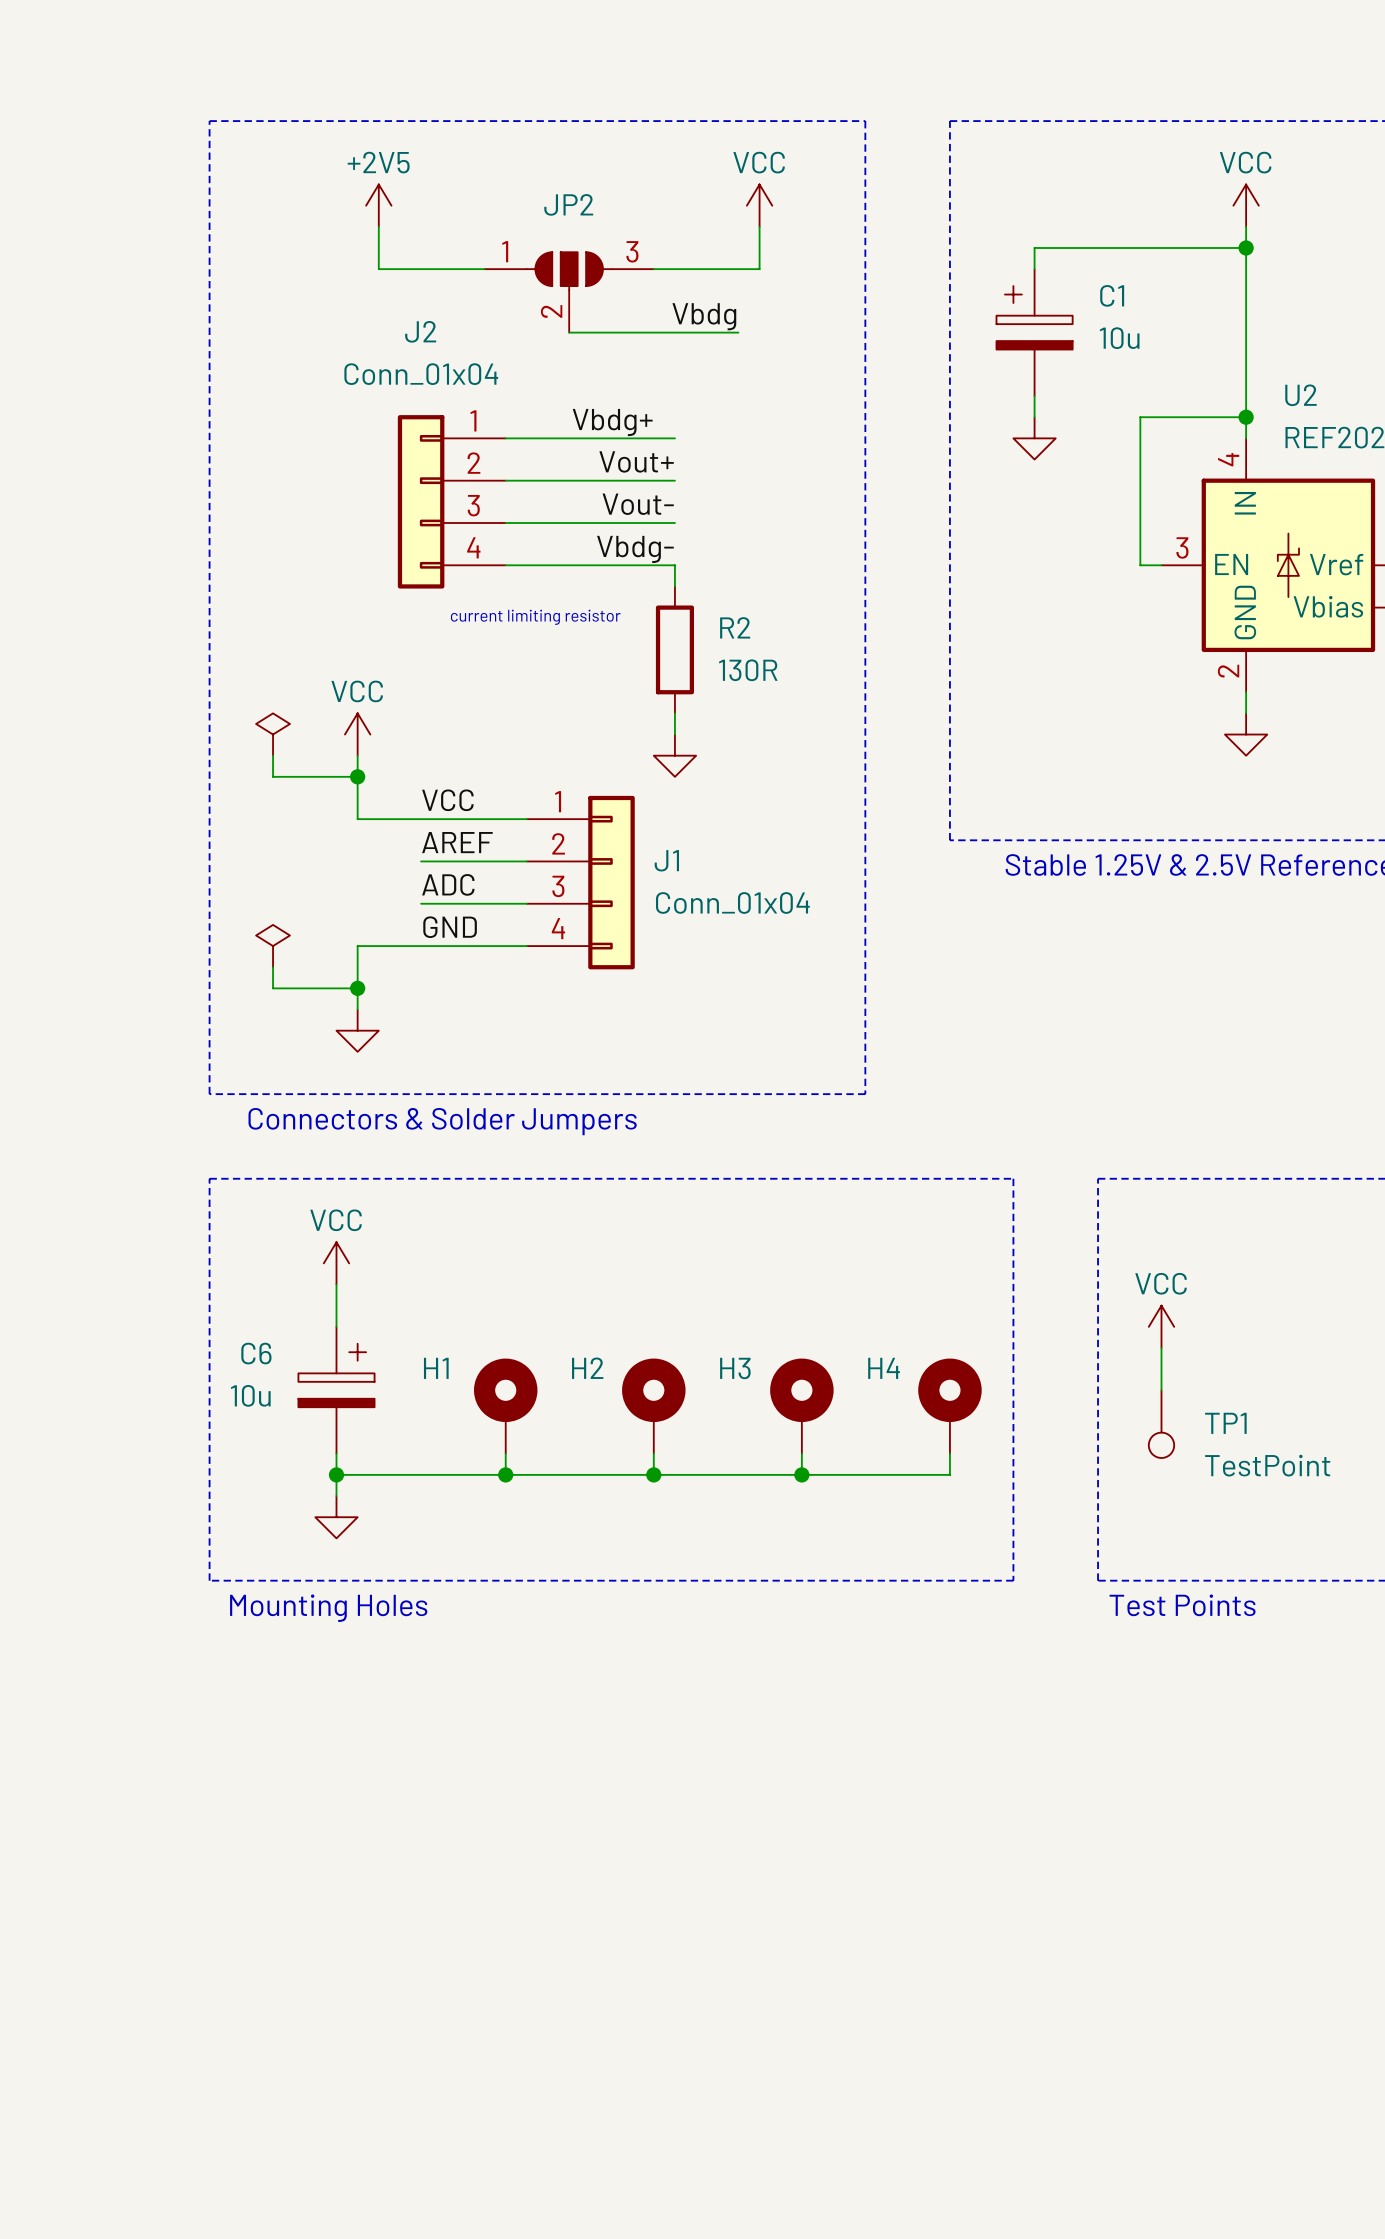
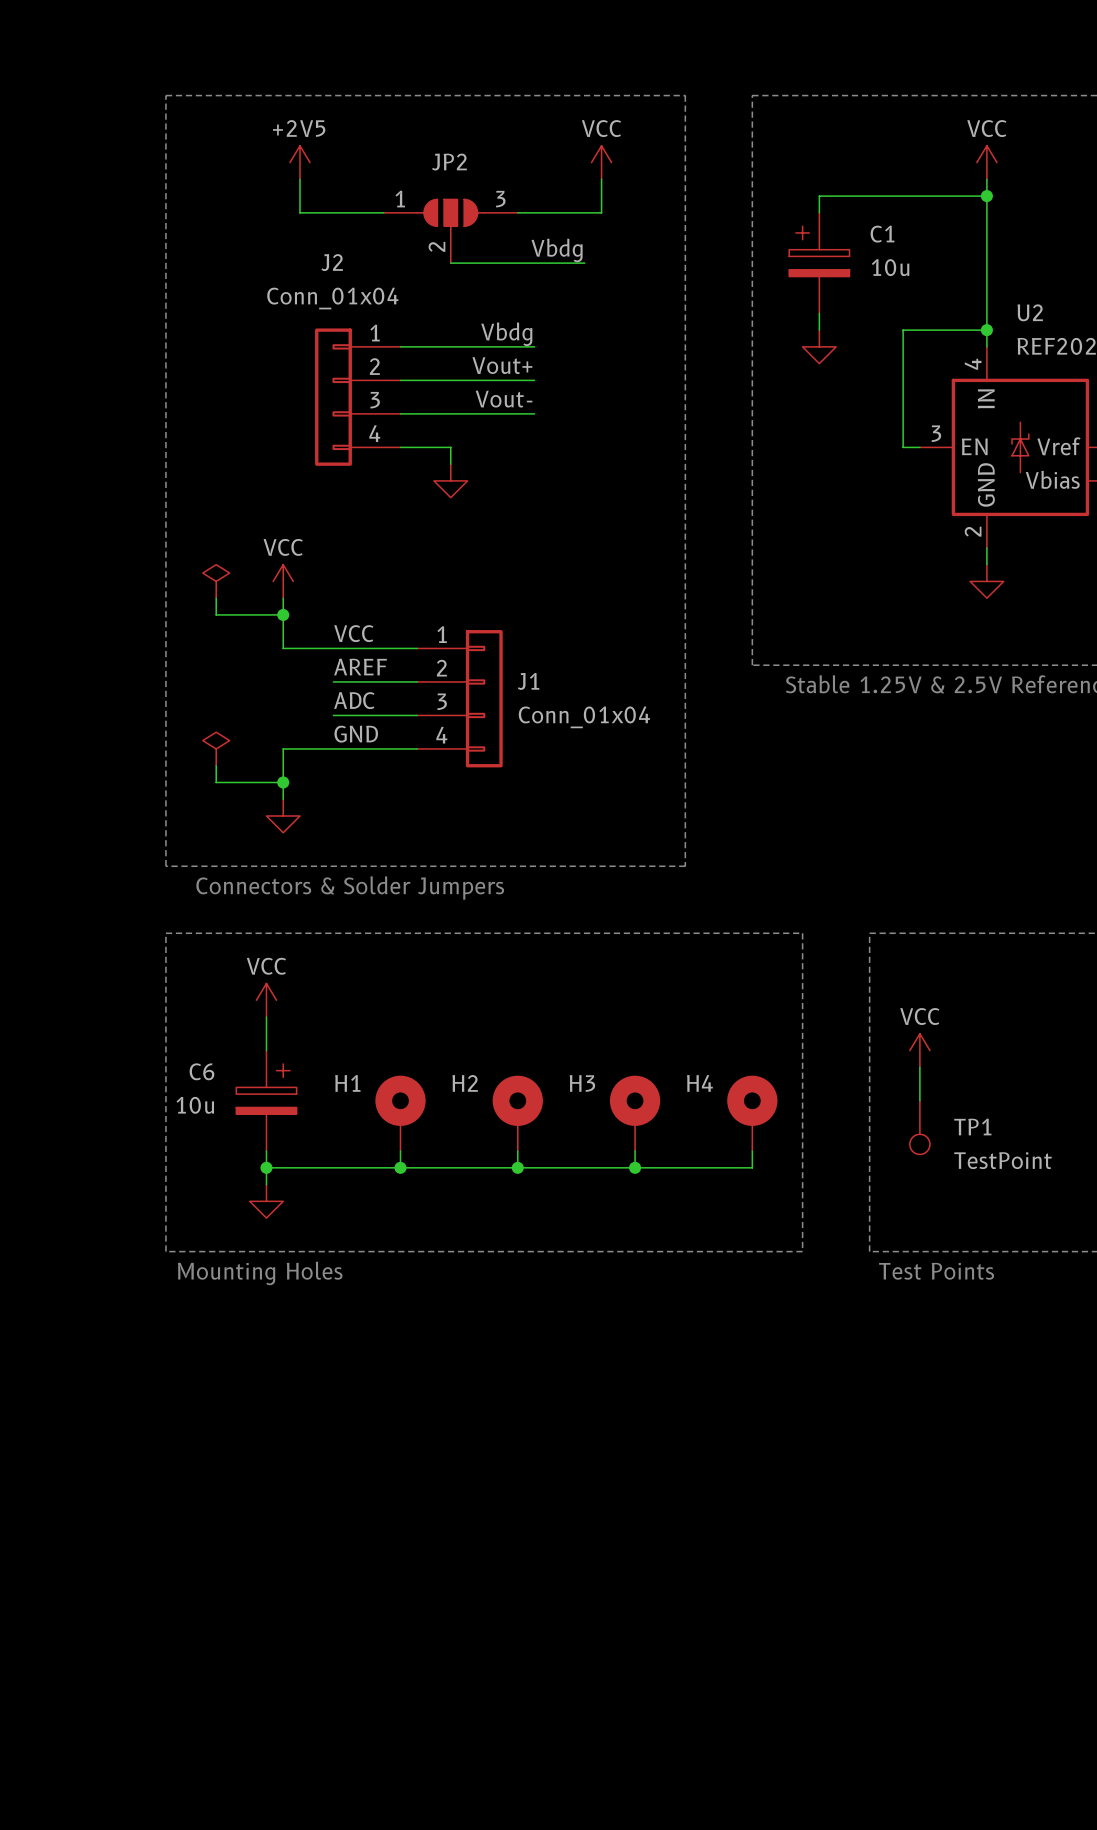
label: Vbdg+ (612, 422) -> Vbdg (506, 334)
label: Vbdg- (635, 549) -> none
wire: (569, 565) (674, 565) (674, 586) -> (450, 447) (450, 464)
text: current limiting resistor (535, 617) -> none
R2: 130R (674, 649) -> none
wire: (674, 713) (674, 734) -> none
power symbol position: (674, 755) -> (450, 480)

